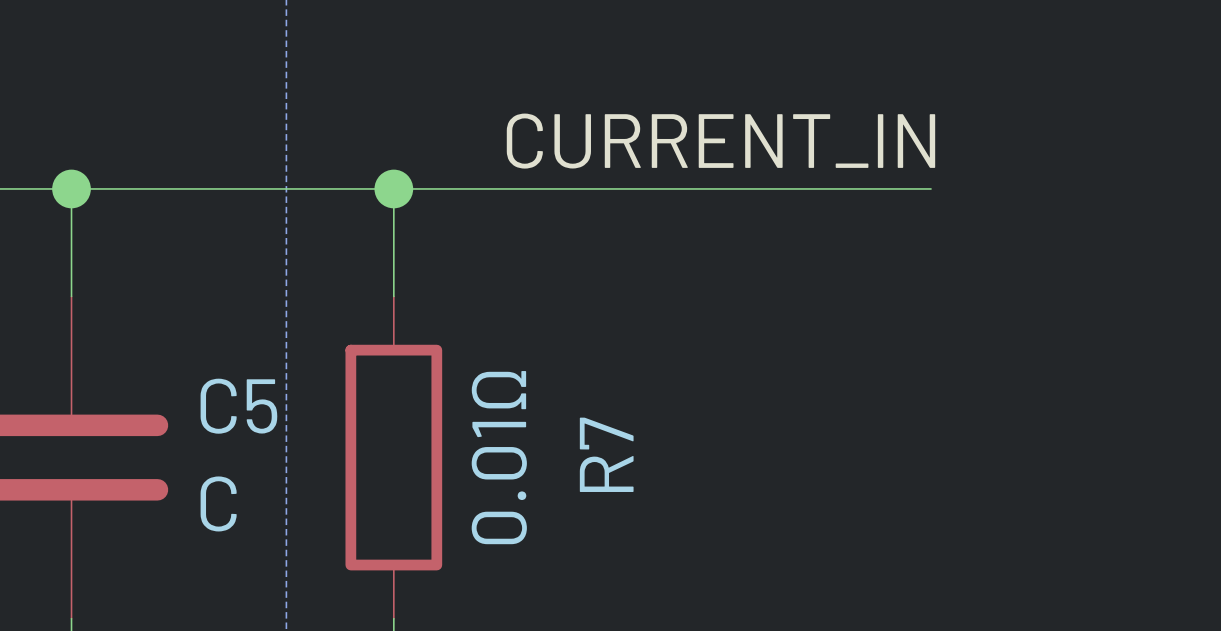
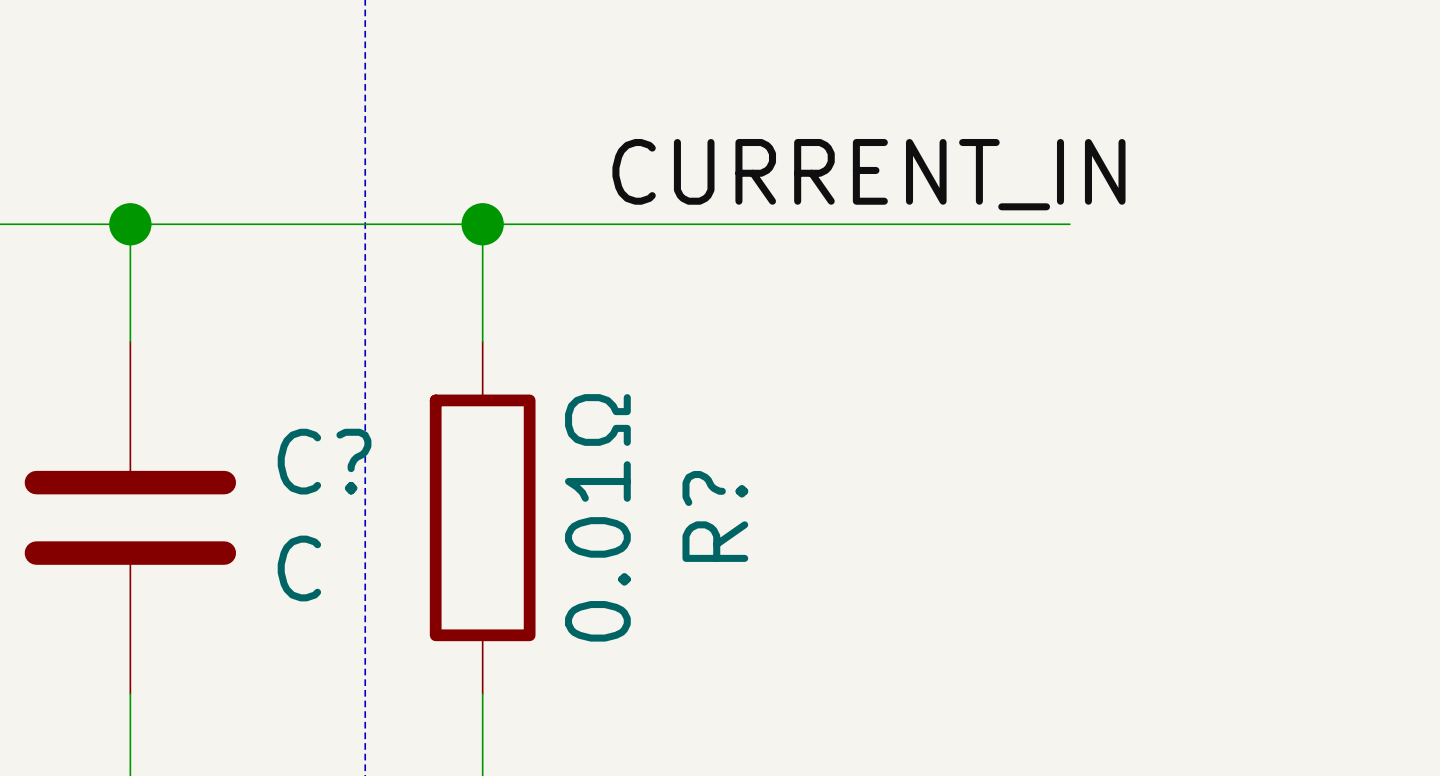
C5 name: C5 (238, 406) -> C? (324, 461)
R7 name: R7 (606, 454) -> R? (715, 516)

